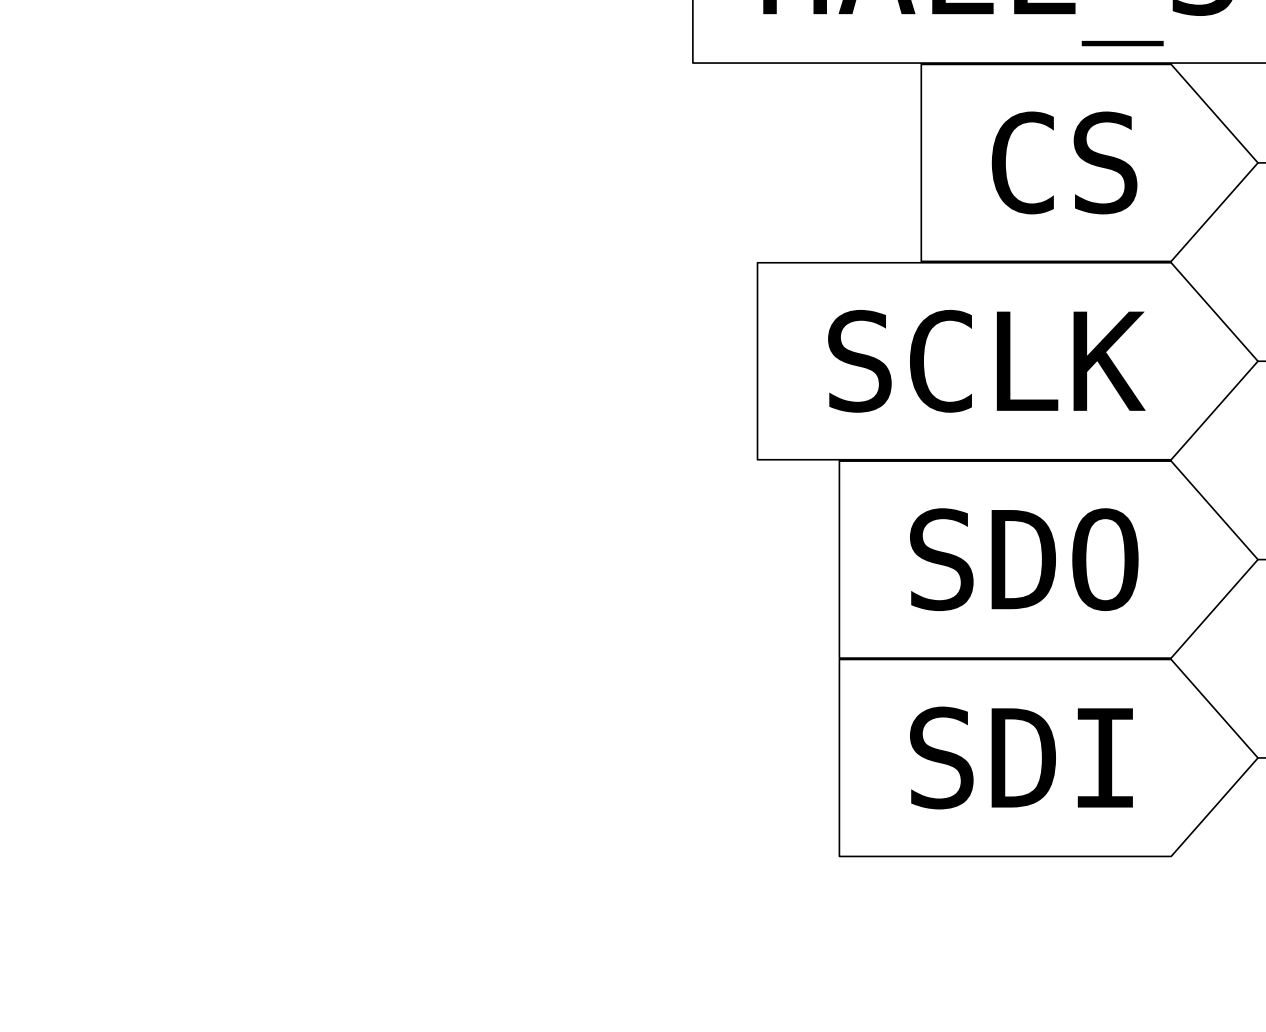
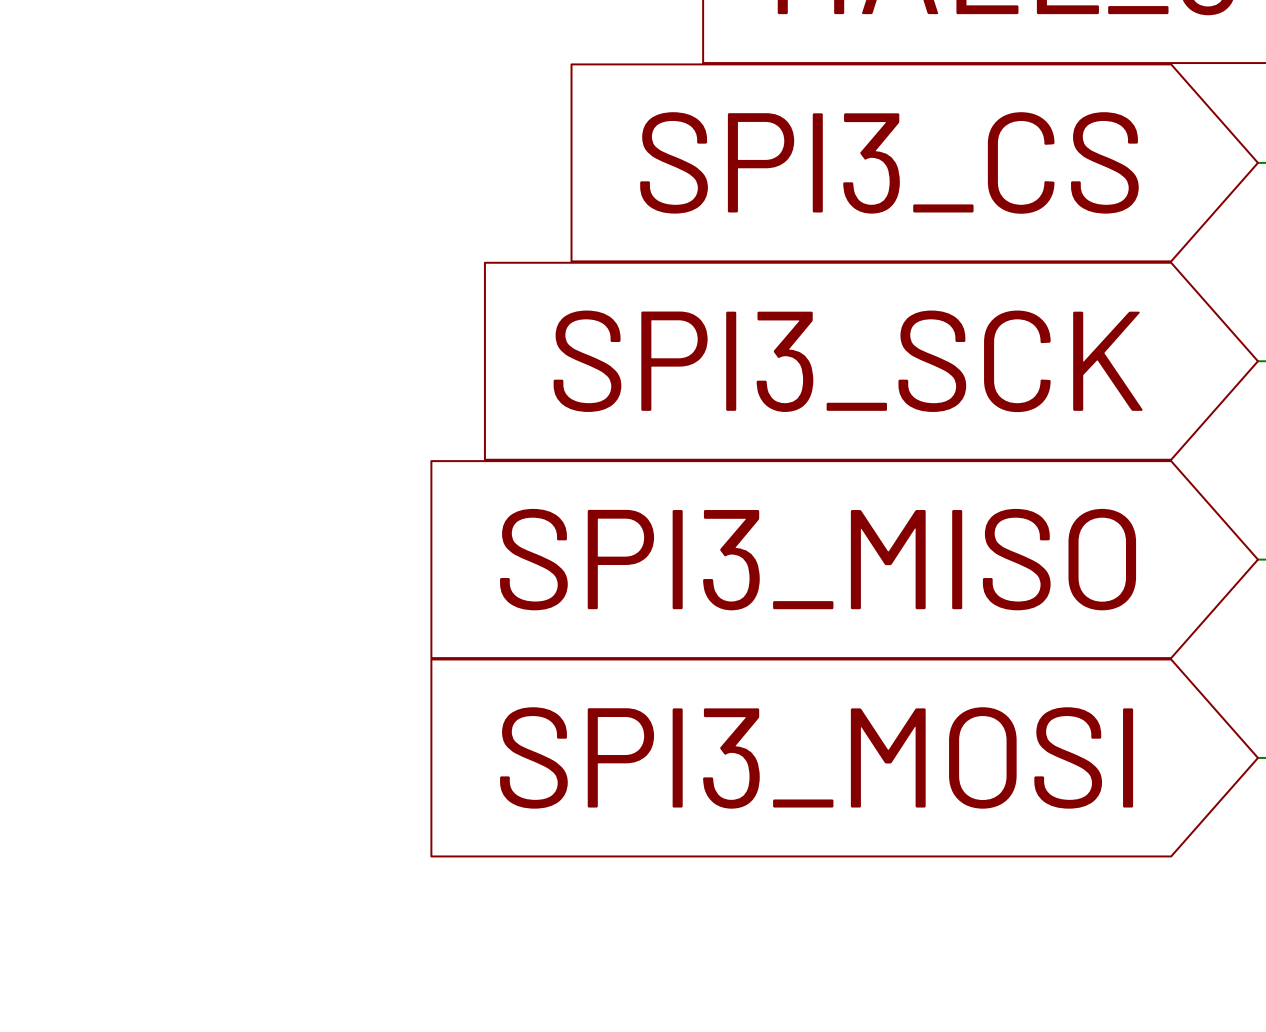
global label: CS (1064, 162) -> SPI3_CS (889, 162)
global label: SCLK (986, 361) -> SPI3_SCK (848, 361)
global label: SDO (1024, 559) -> SPI3_MISO (818, 559)
global label: SDI (1021, 758) -> SPI3_MOSI (816, 757)

